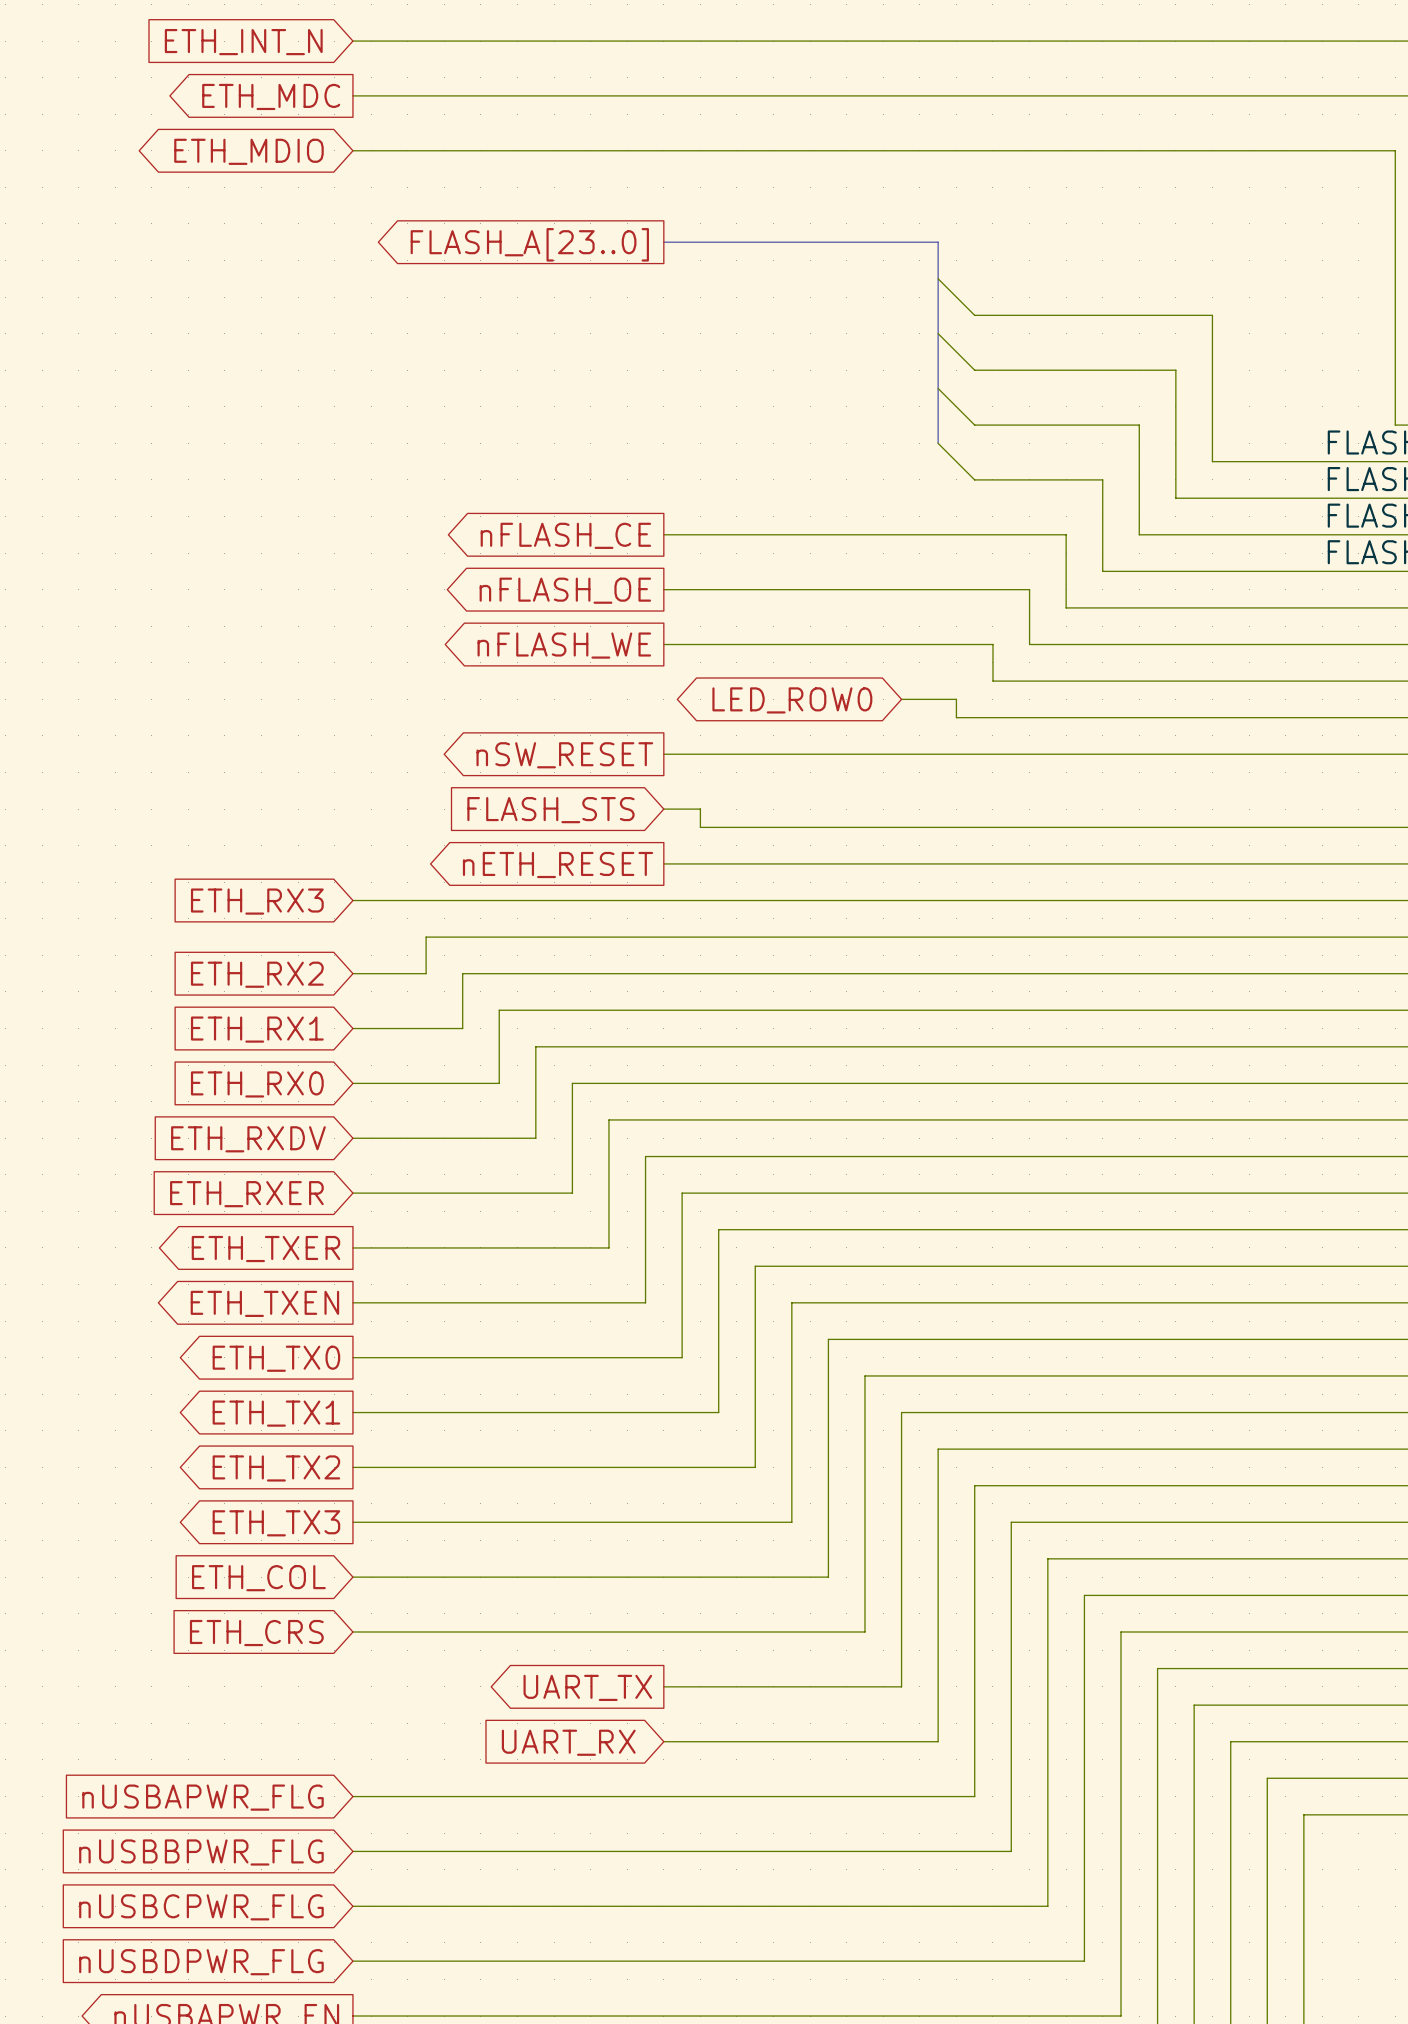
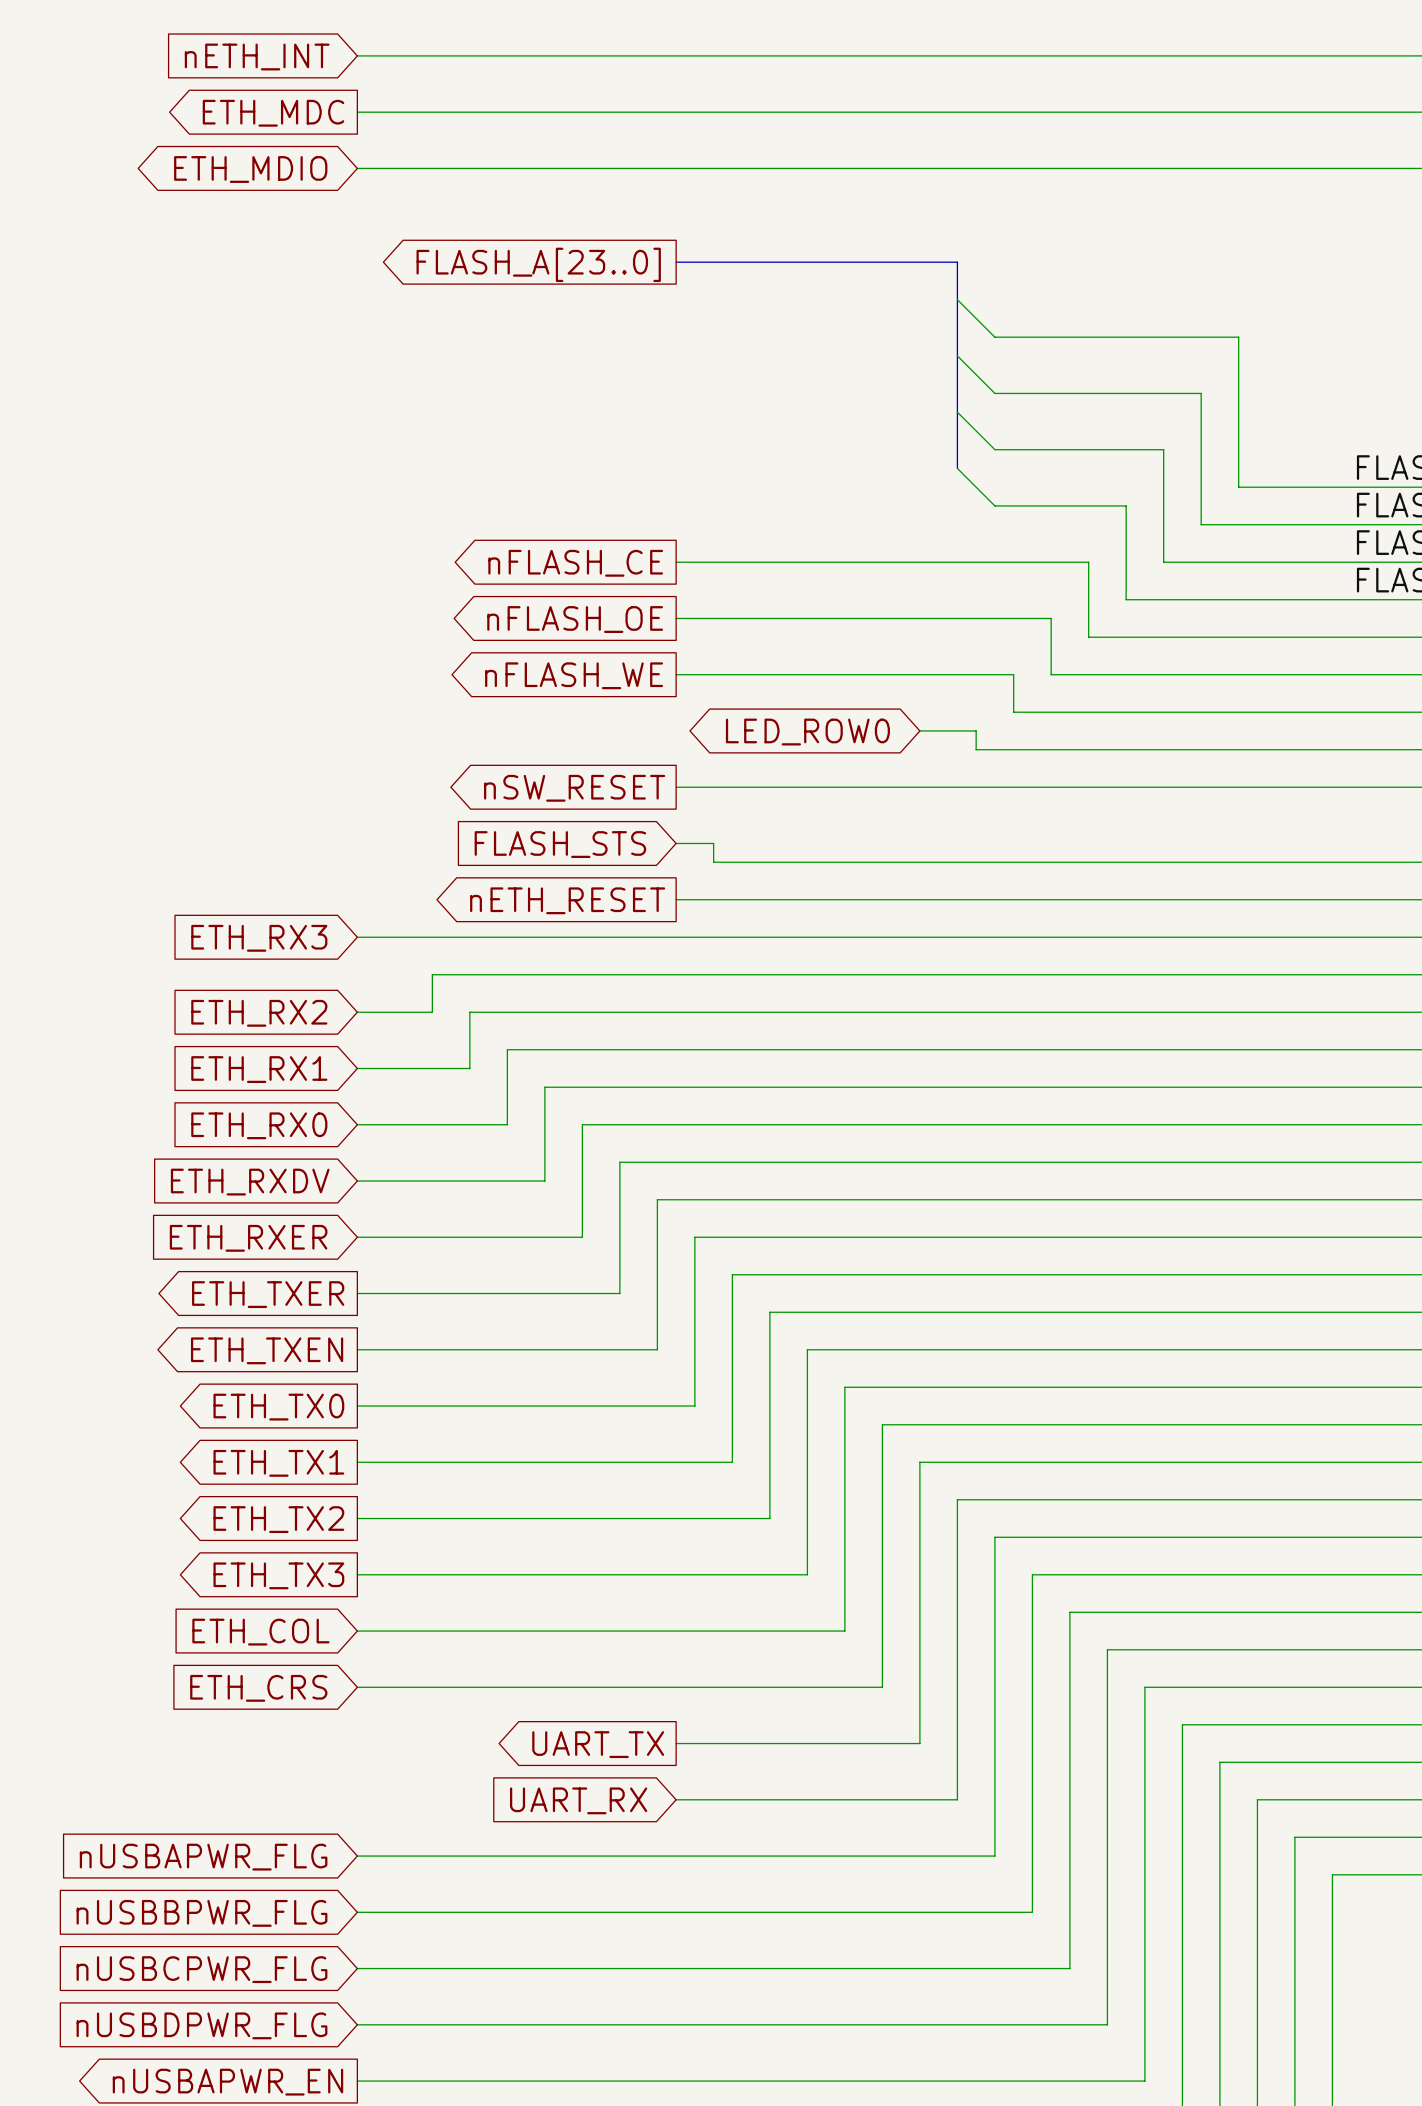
global label: ETH_INT_N (243, 42) -> nETH_INT (257, 56)

